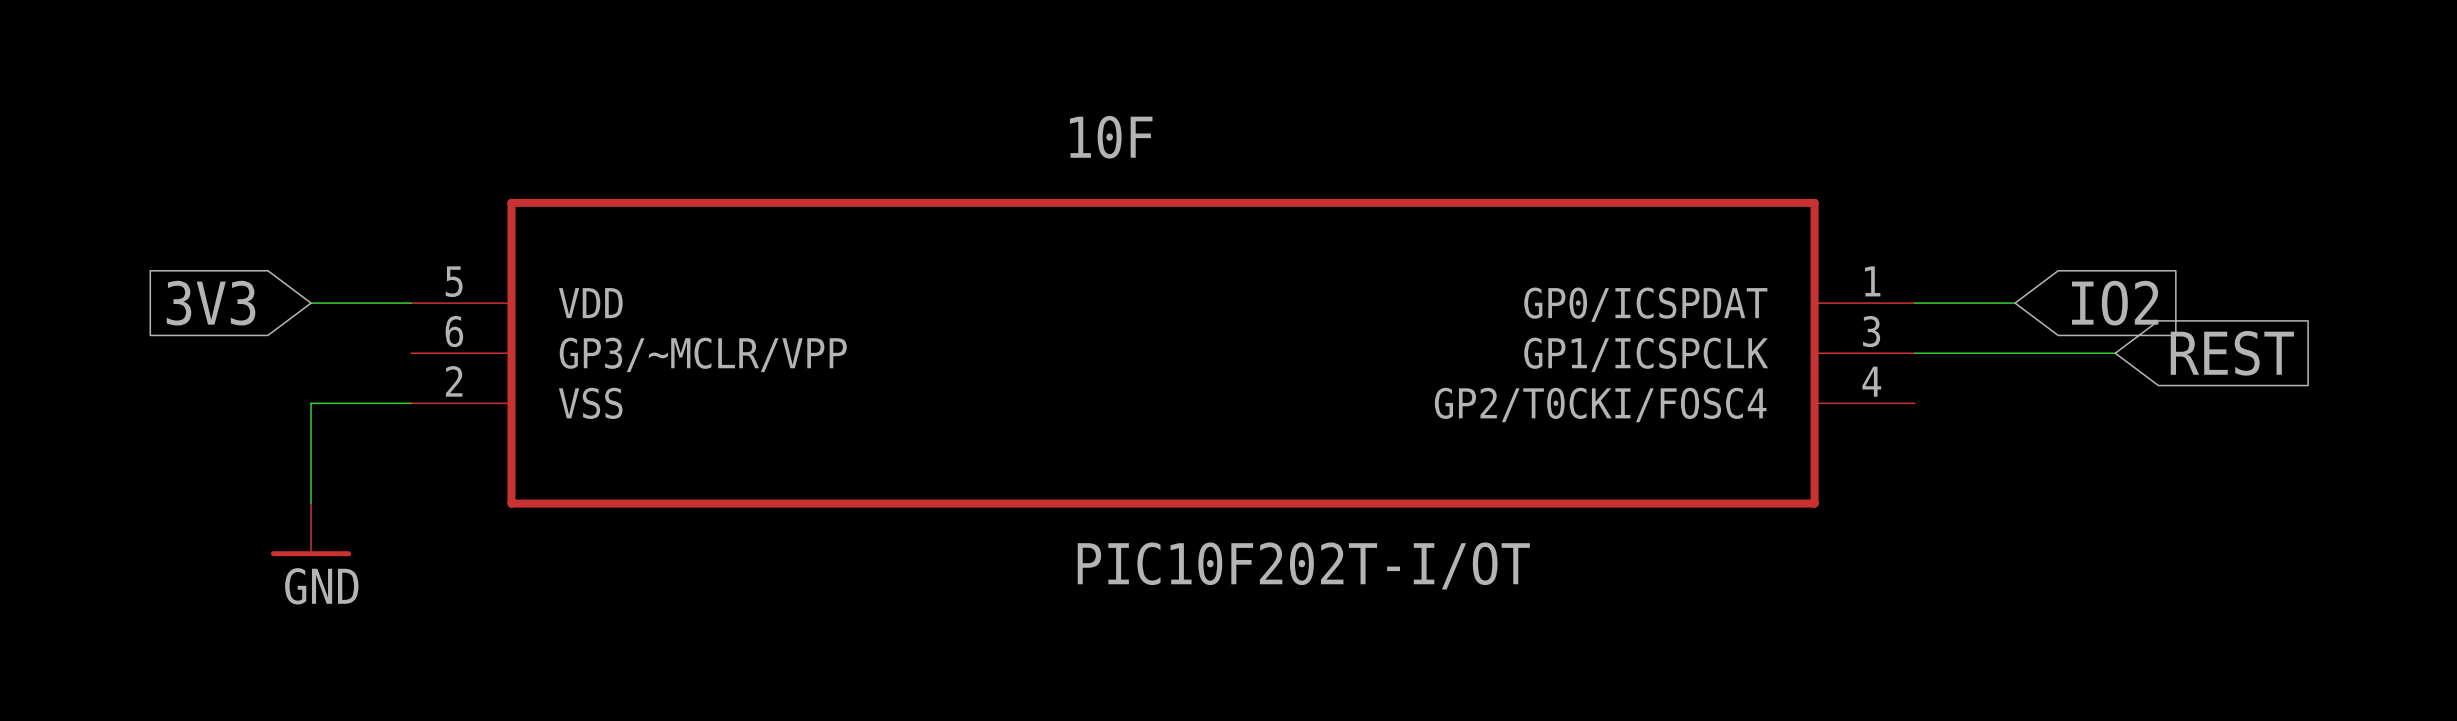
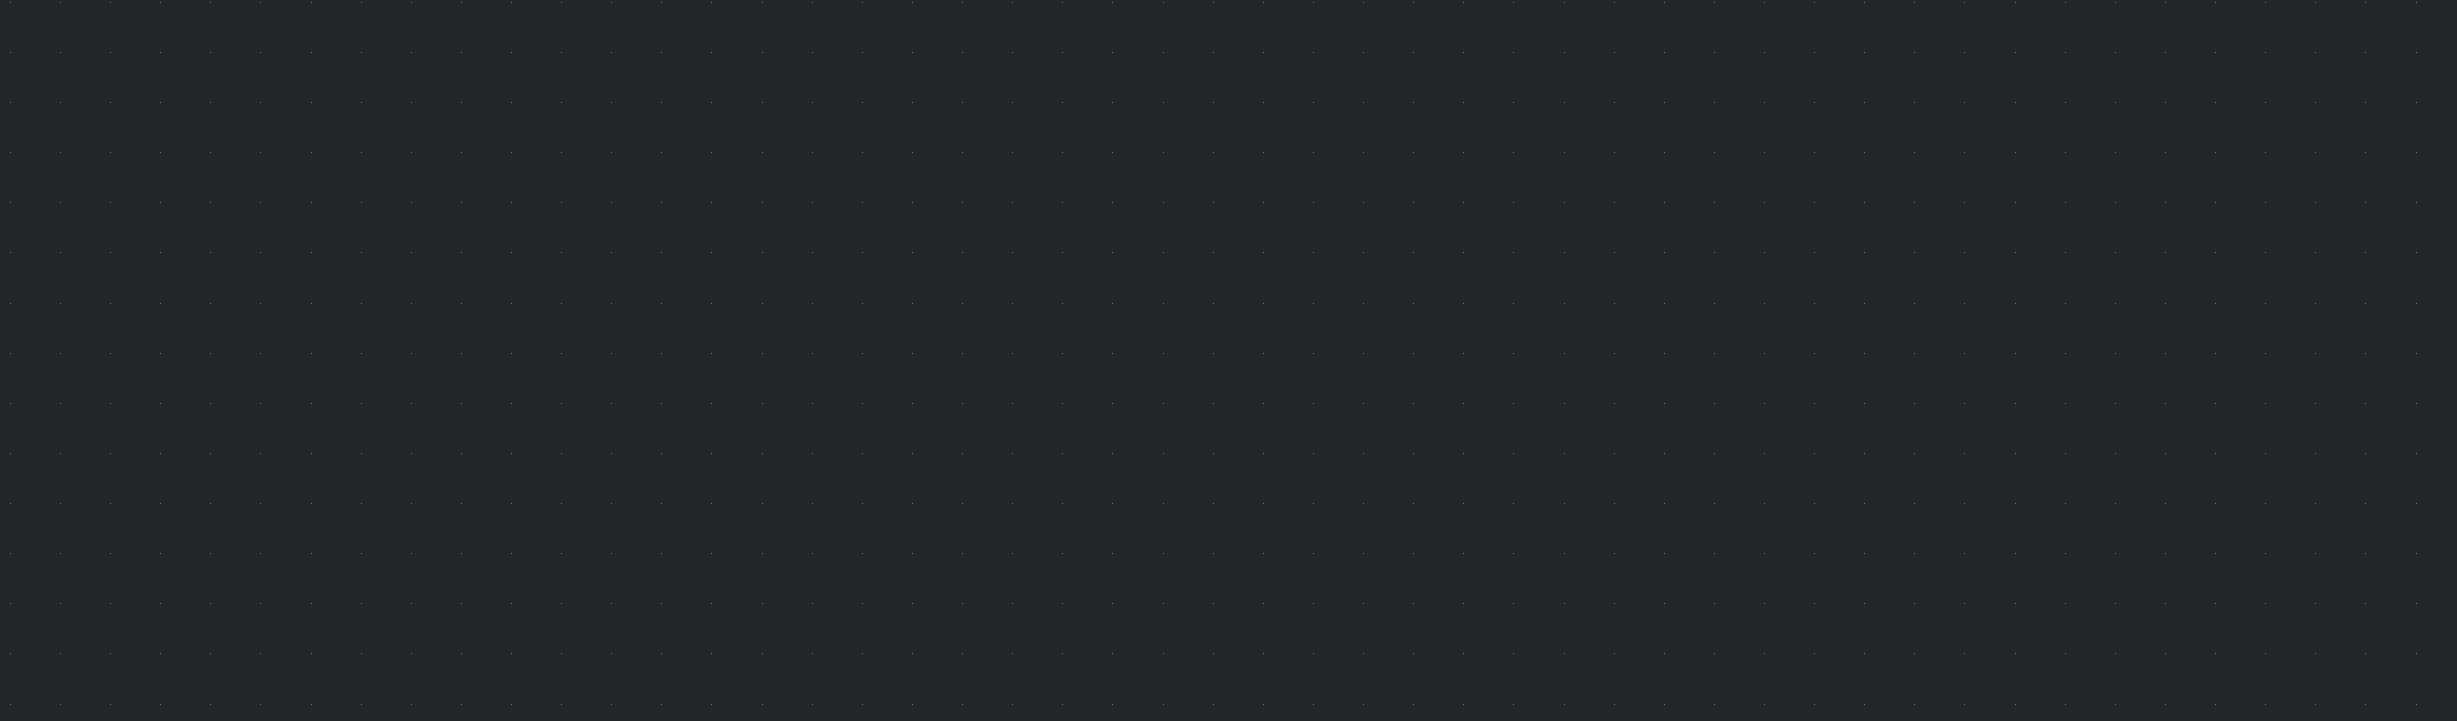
global label: 3V3 (211, 303) -> none
wire: (311, 303) (411, 303) -> none
wire: (1914, 303) (2015, 303) -> none
global label: IO2 (2115, 303) -> none
10F: PIC10F202T-I/OT (1163, 353) -> none
wire: (1914, 353) (2115, 353) -> none
global label: REST (2232, 353) -> none
wire: (411, 403) (311, 403) (311, 503) -> none
power symbol: GND (311, 529) -> none

